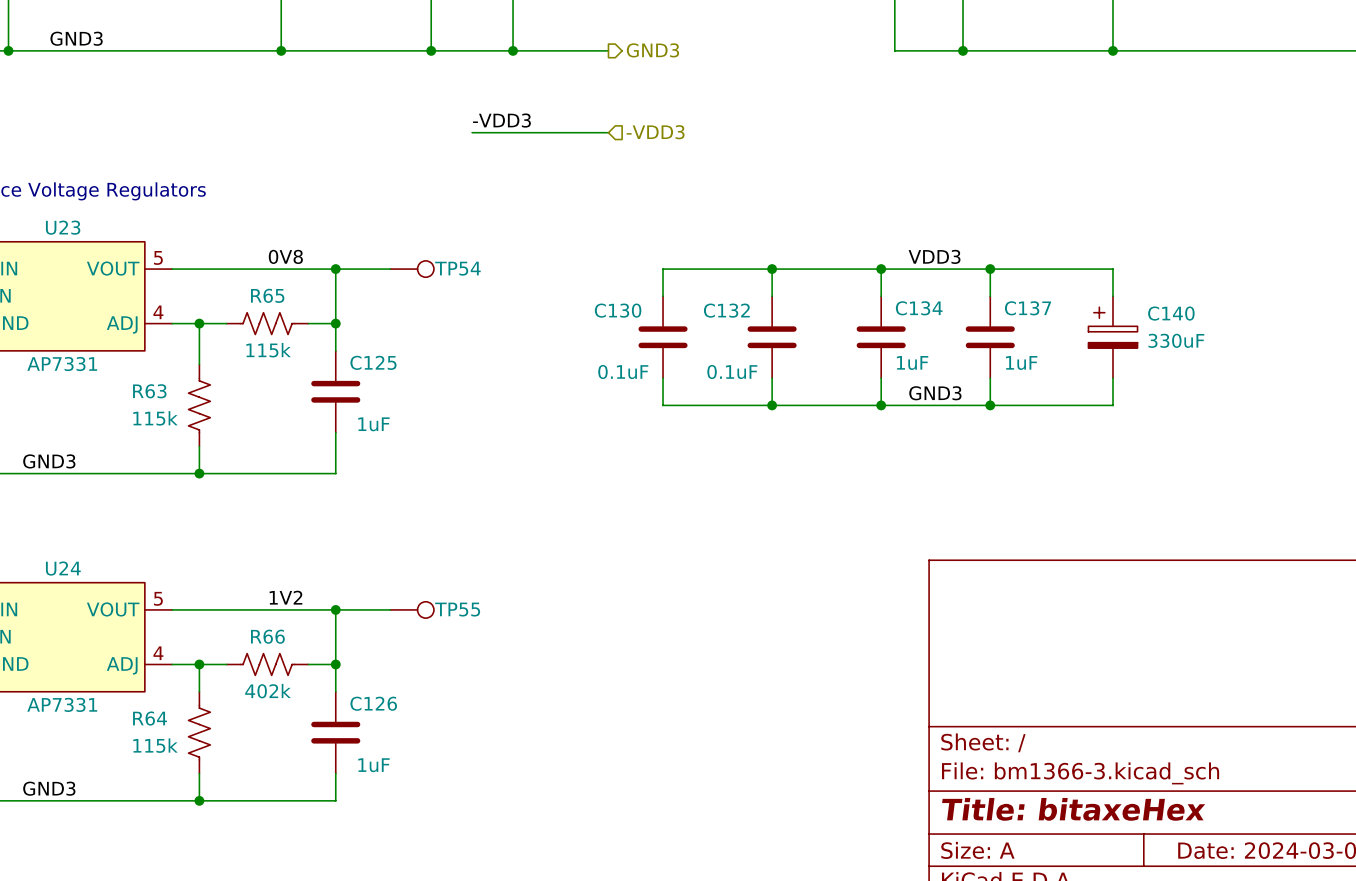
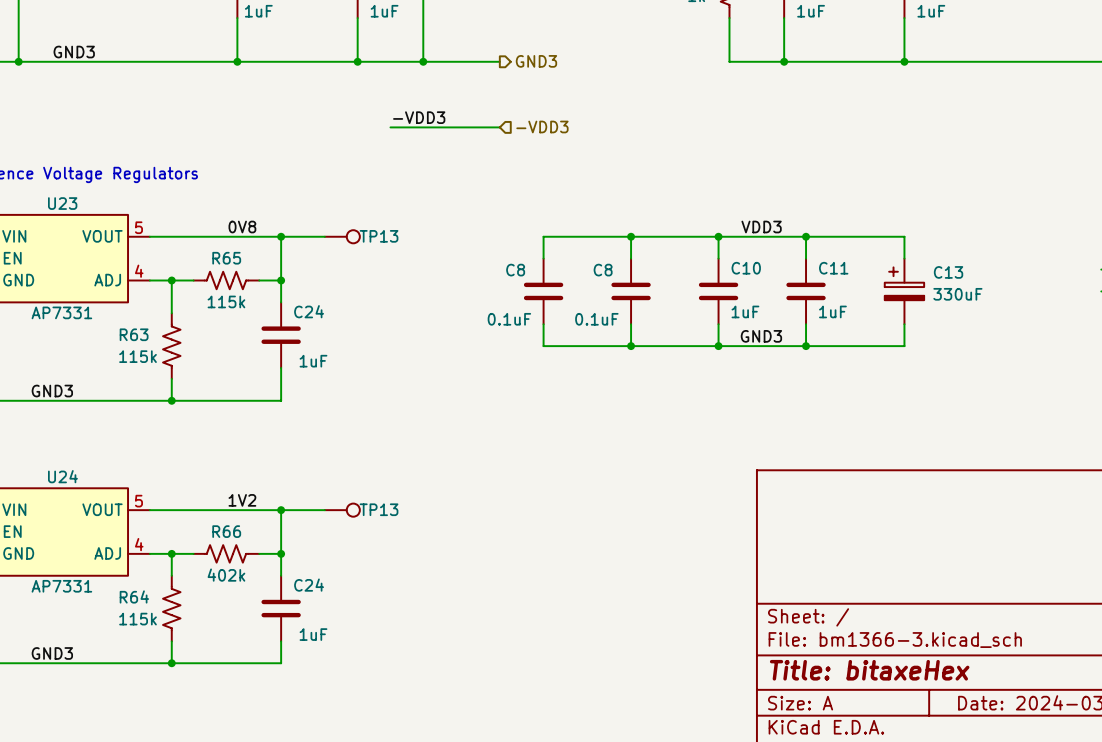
TP54 name: TP54 (457, 268) -> TP13 (379, 236)
C134 name: C134 (919, 308) -> C10 (746, 268)
C137 name: C137 (1028, 308) -> C11 (833, 268)
C130 name: C130 (618, 310) -> C8 (515, 270)
C132 name: C132 (726, 310) -> C8 (603, 270)
C140 name: C140 (1171, 313) -> C13 (948, 272)
C125 name: C125 (373, 362) -> C24 (309, 311)
TP55 name: TP55 (457, 609) -> TP13 (379, 509)
C126 name: C126 (373, 703) -> C24 (309, 585)

